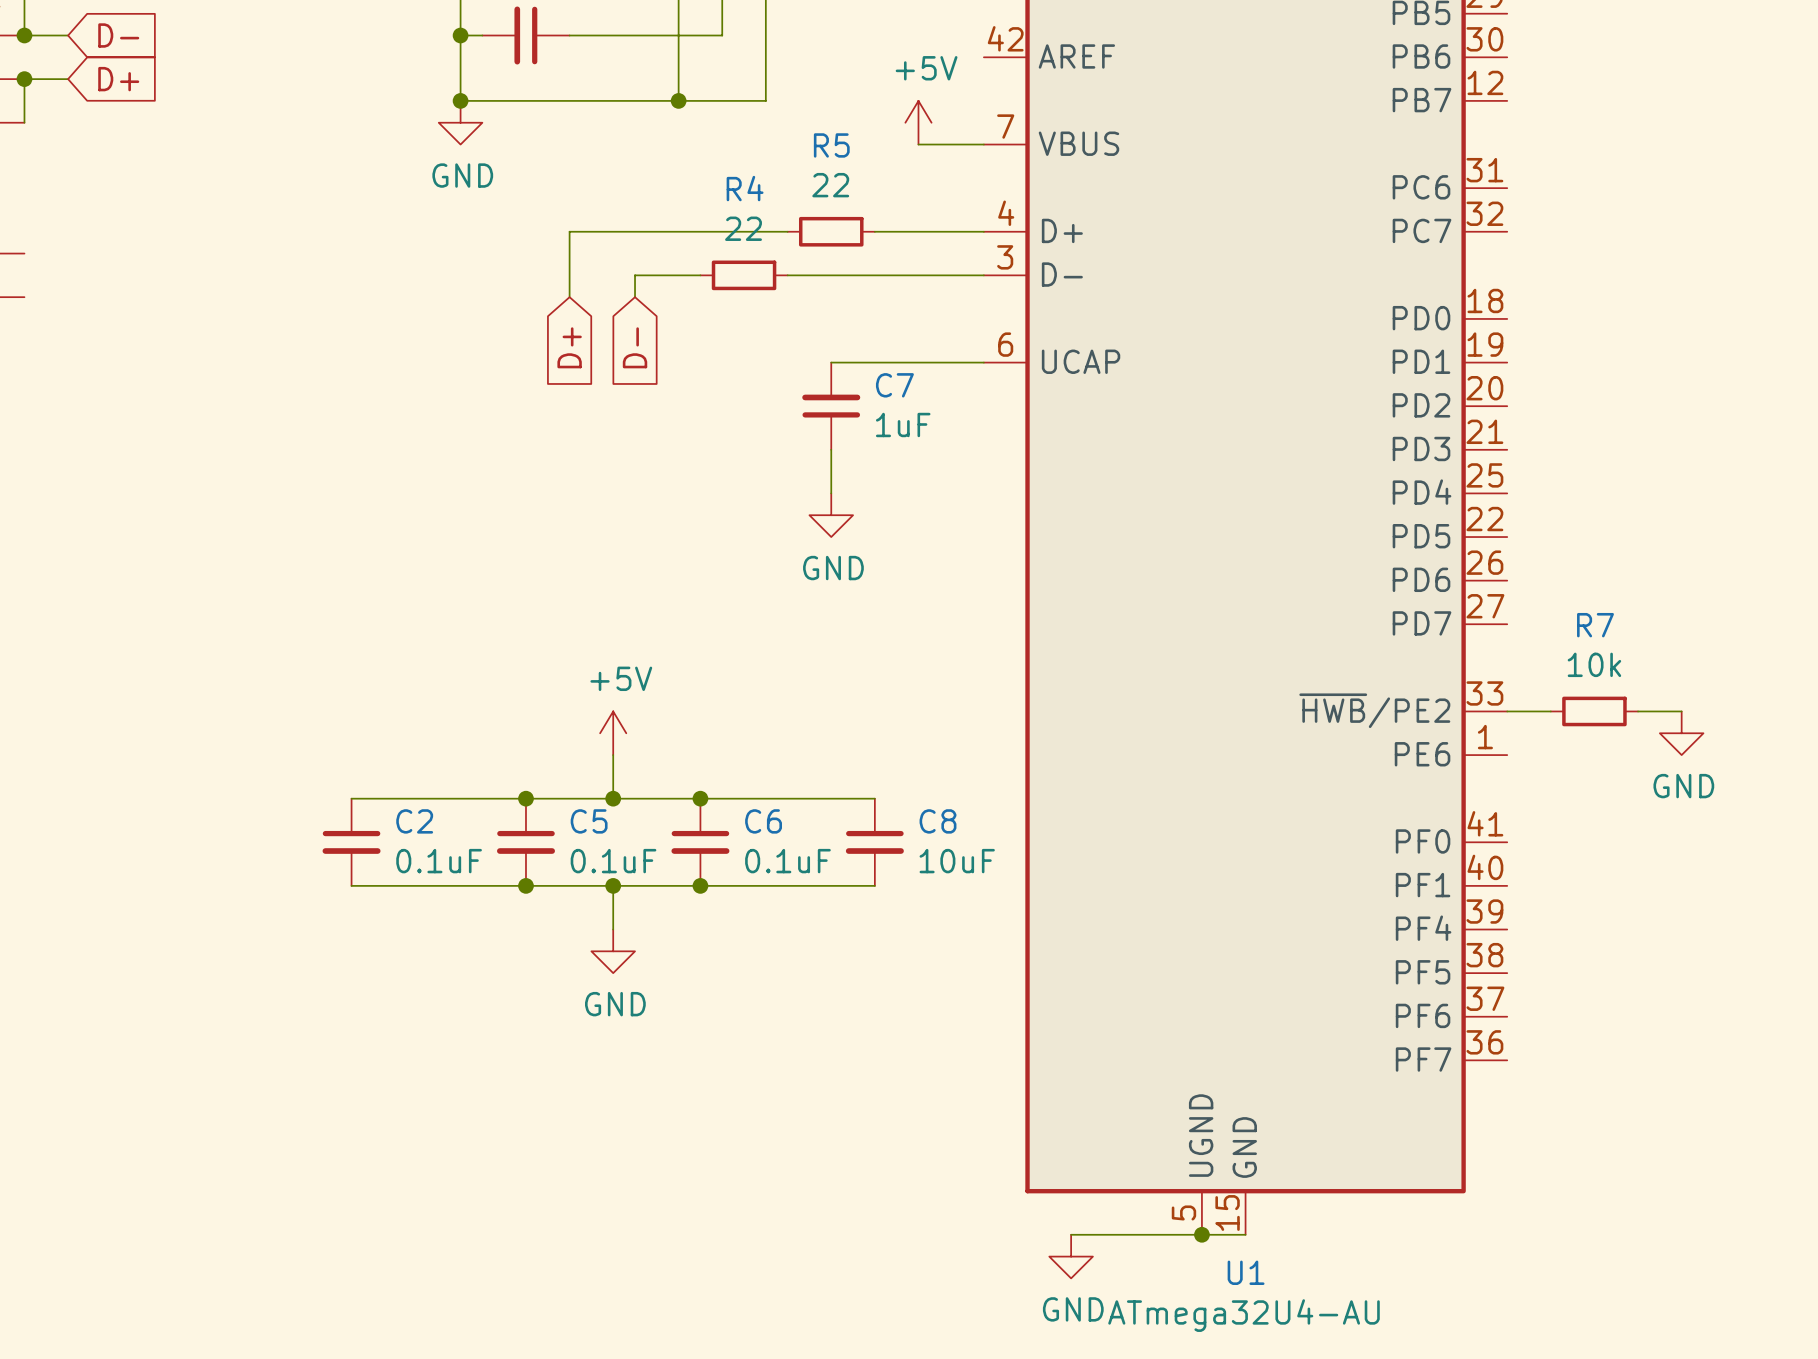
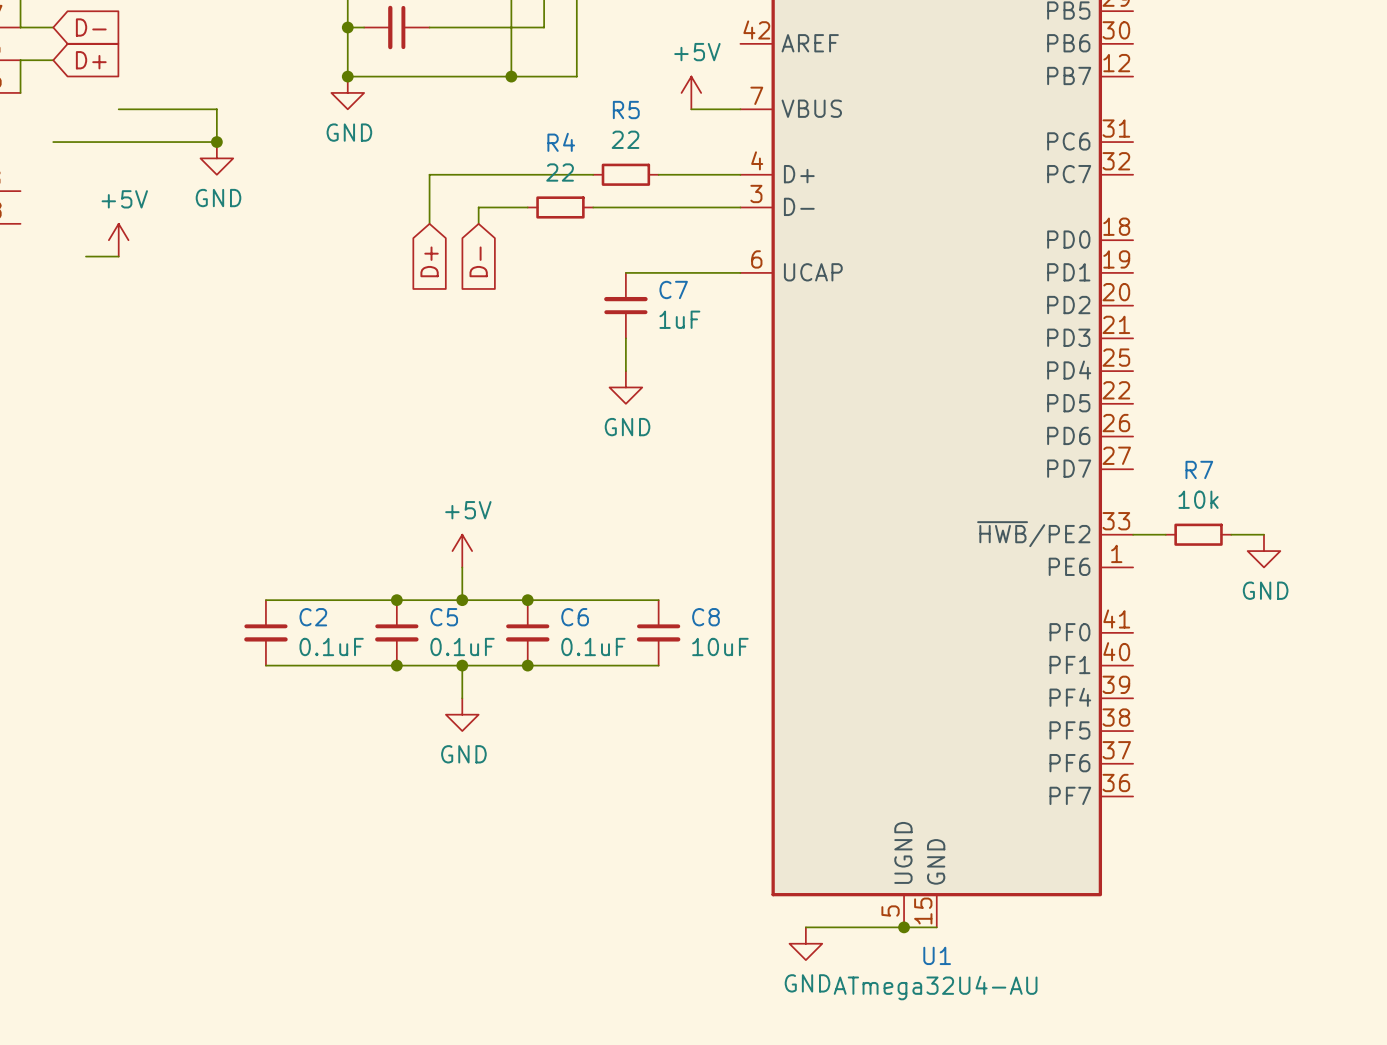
junction: (24, 35) -> none
junction: (24, 79) -> none
wire: none -> (118, 109) (216, 109) (216, 142) (53, 142)
junction: none -> (216, 142)
power symbol: none -> GND (216, 158)
power symbol: none -> +5V (118, 240)
wire: none -> (85, 256) (118, 256)

